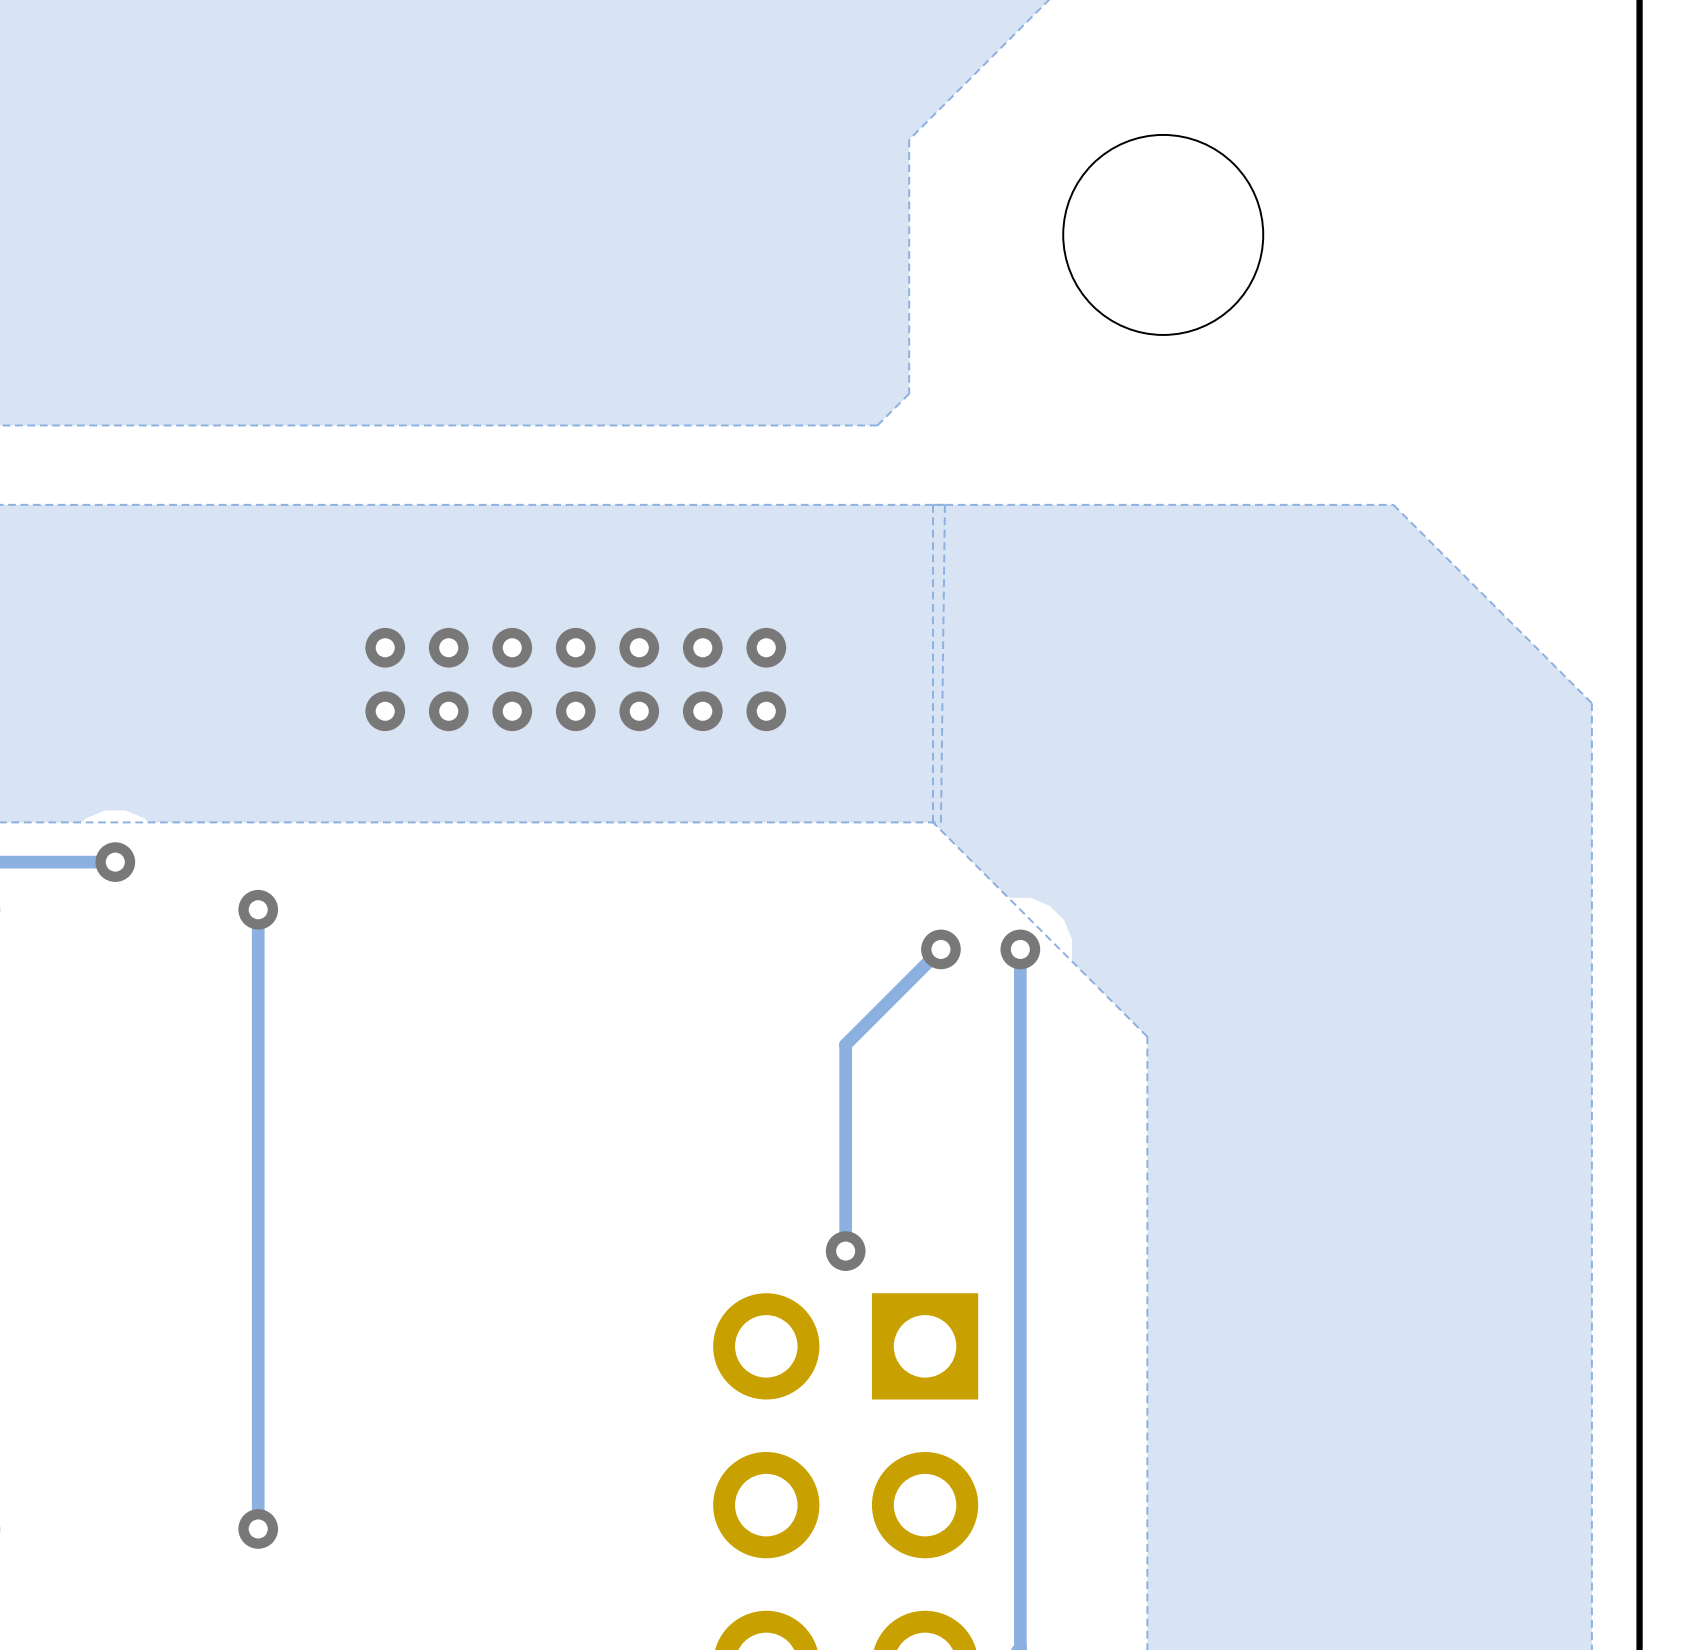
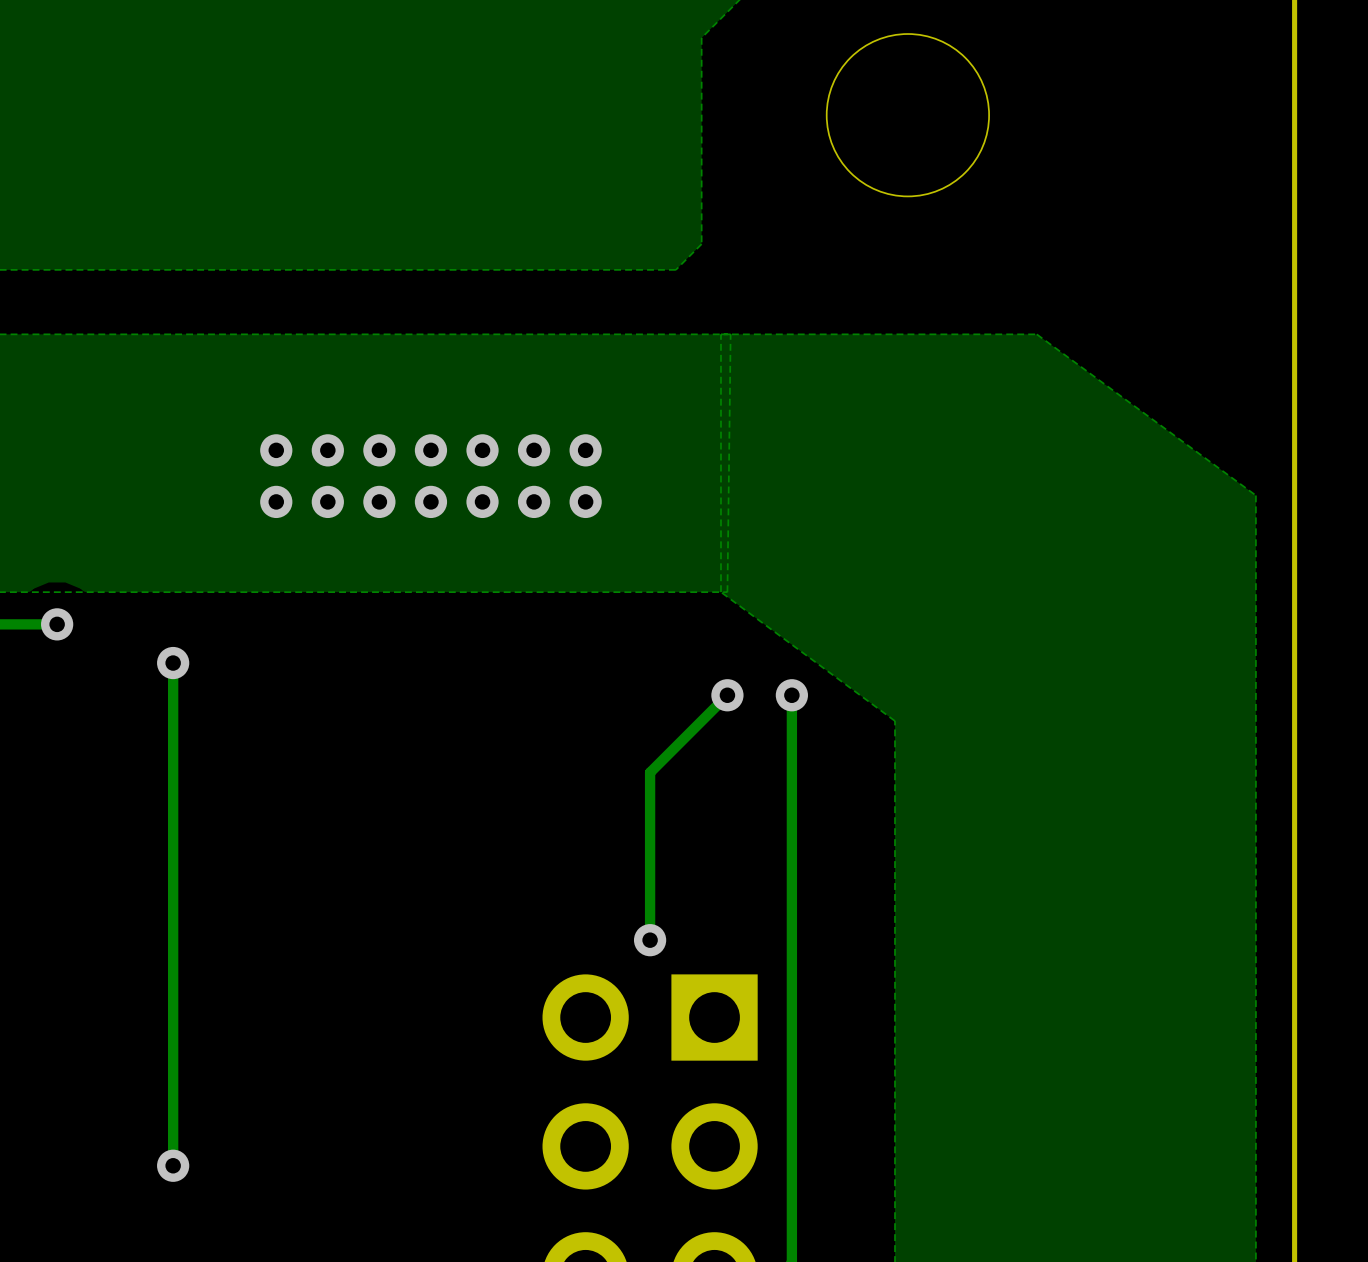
zone outline: (1322, 504) (1393, 504) (1591, 703) -> (1036, 334) (1255, 495)
zone outline: (933, 822) (1147, 1036) -> (720, 592) (895, 721) (895, 766)

